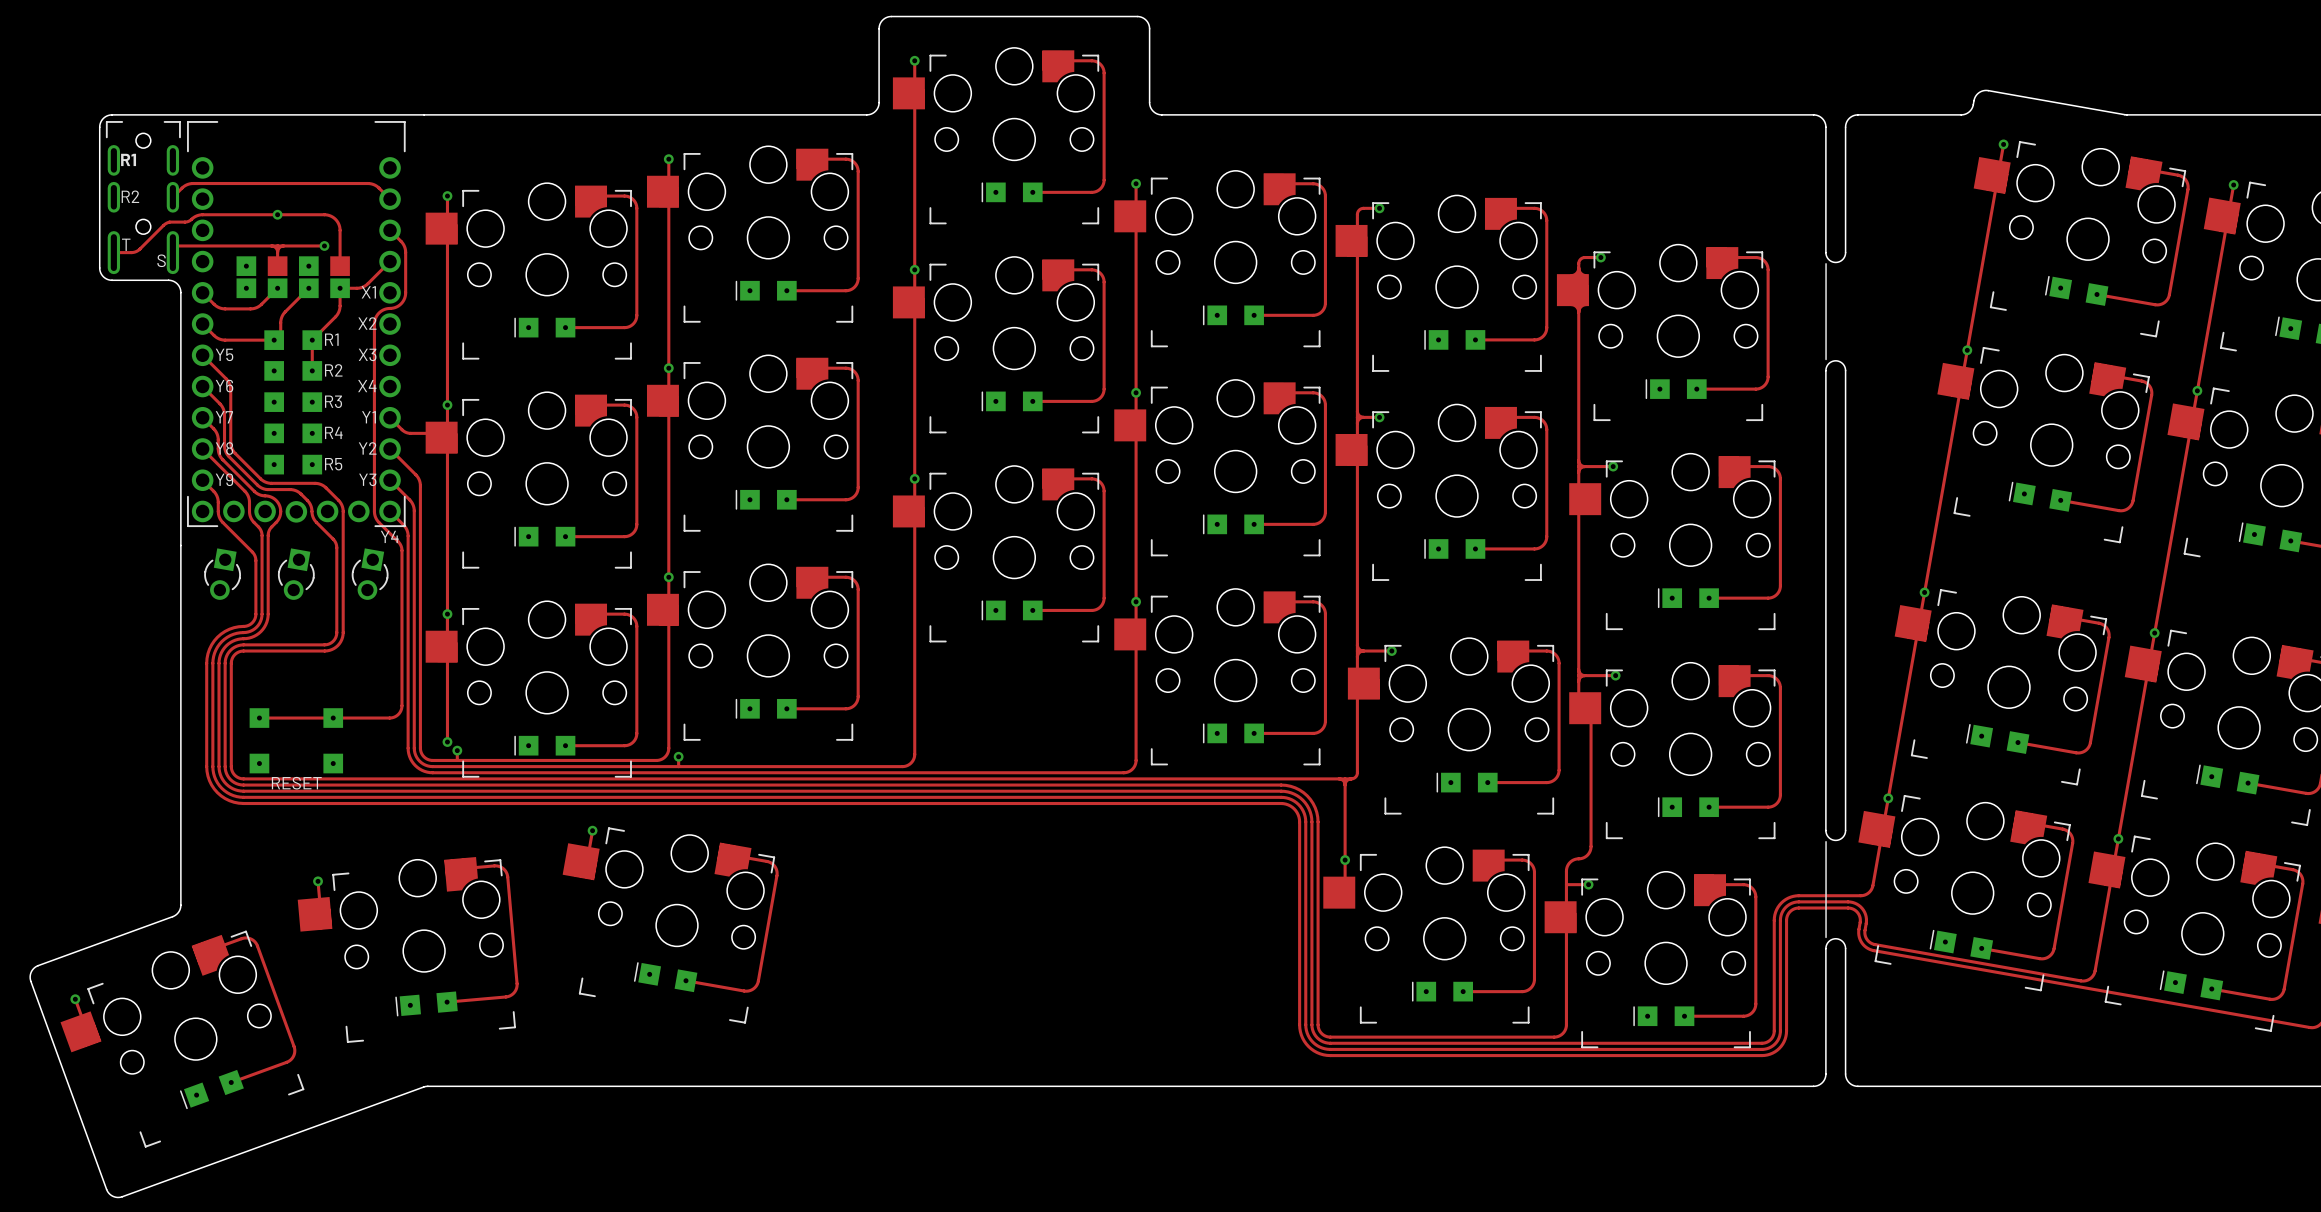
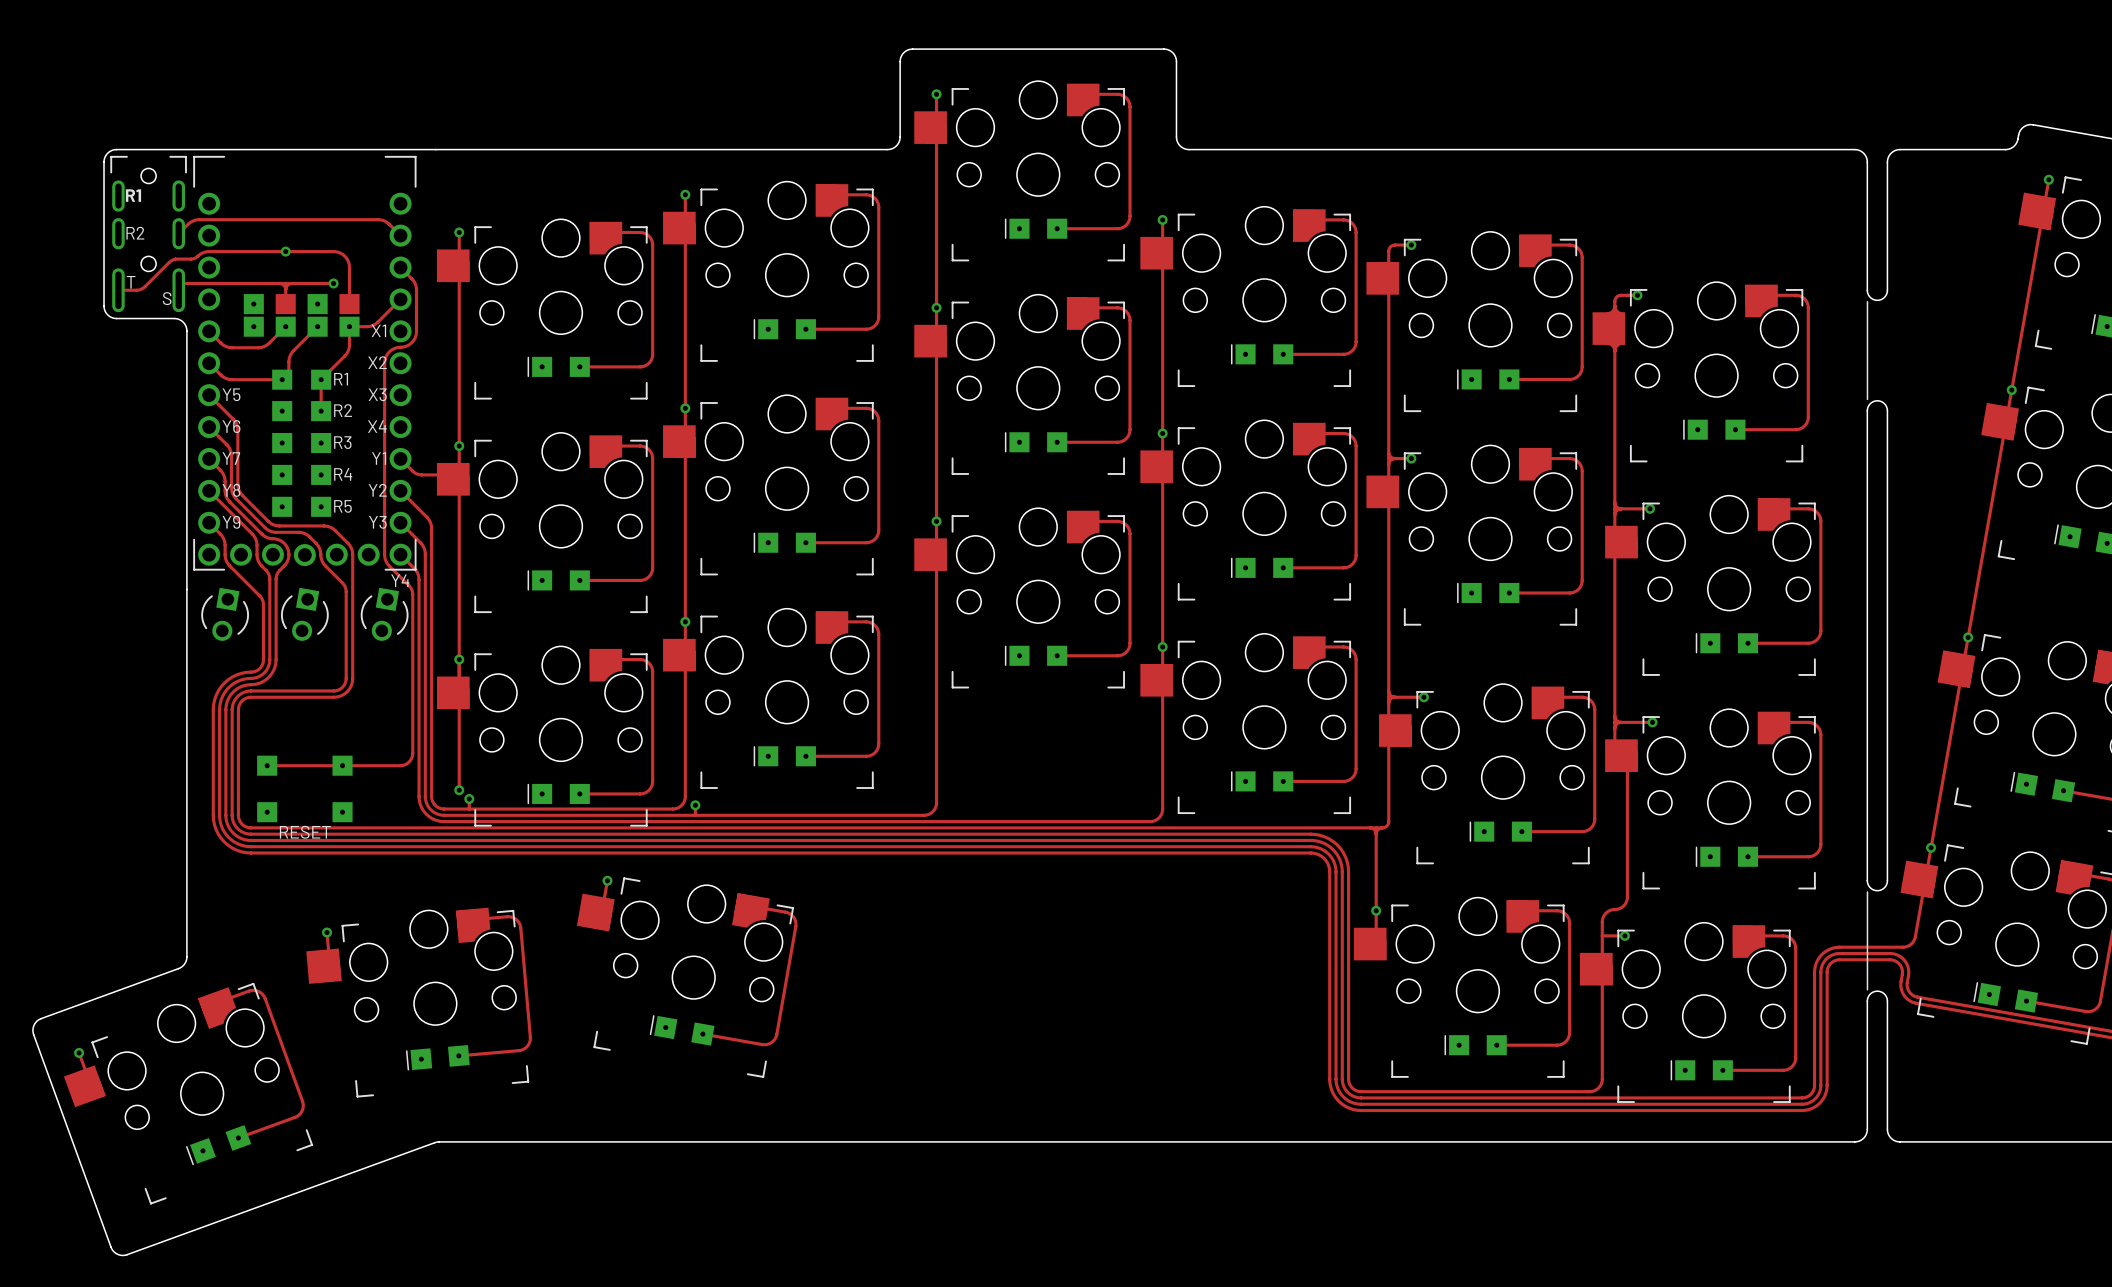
part footprint: [204, 548, 241, 600] -> [201, 587, 250, 641]
part footprint: [277, 548, 315, 600] -> [280, 587, 329, 641]
part footprint: [351, 548, 389, 600] -> [360, 587, 409, 641]

